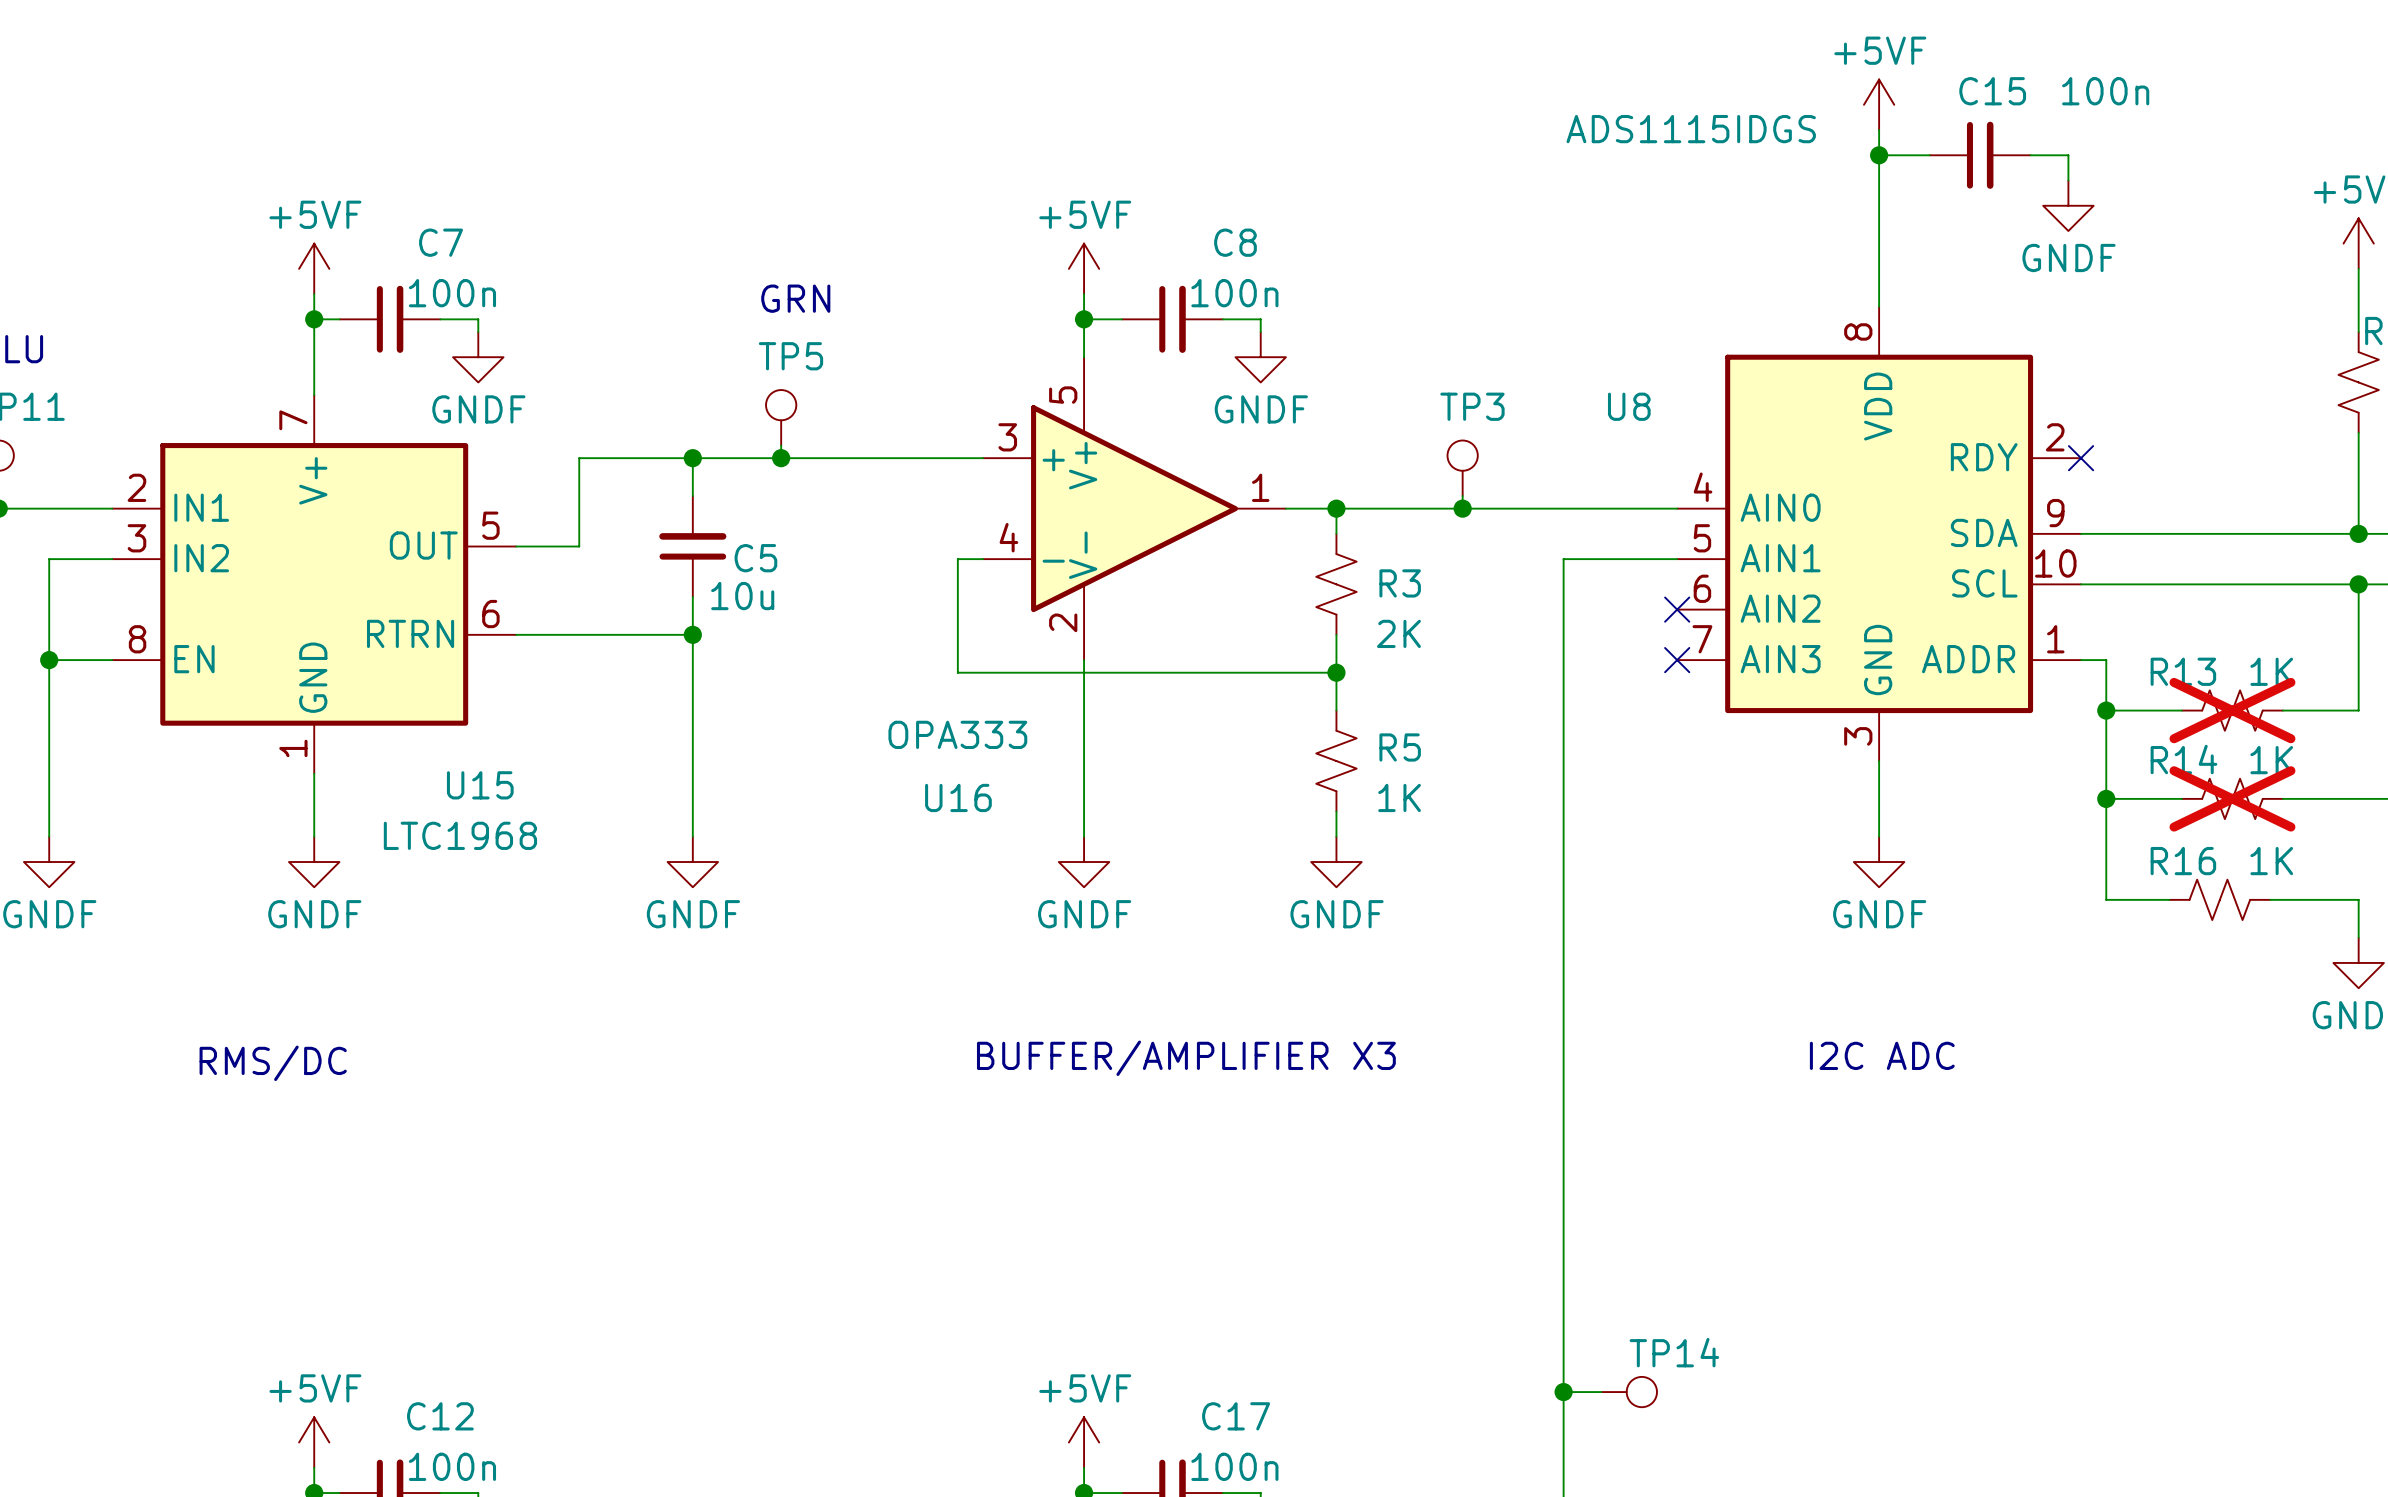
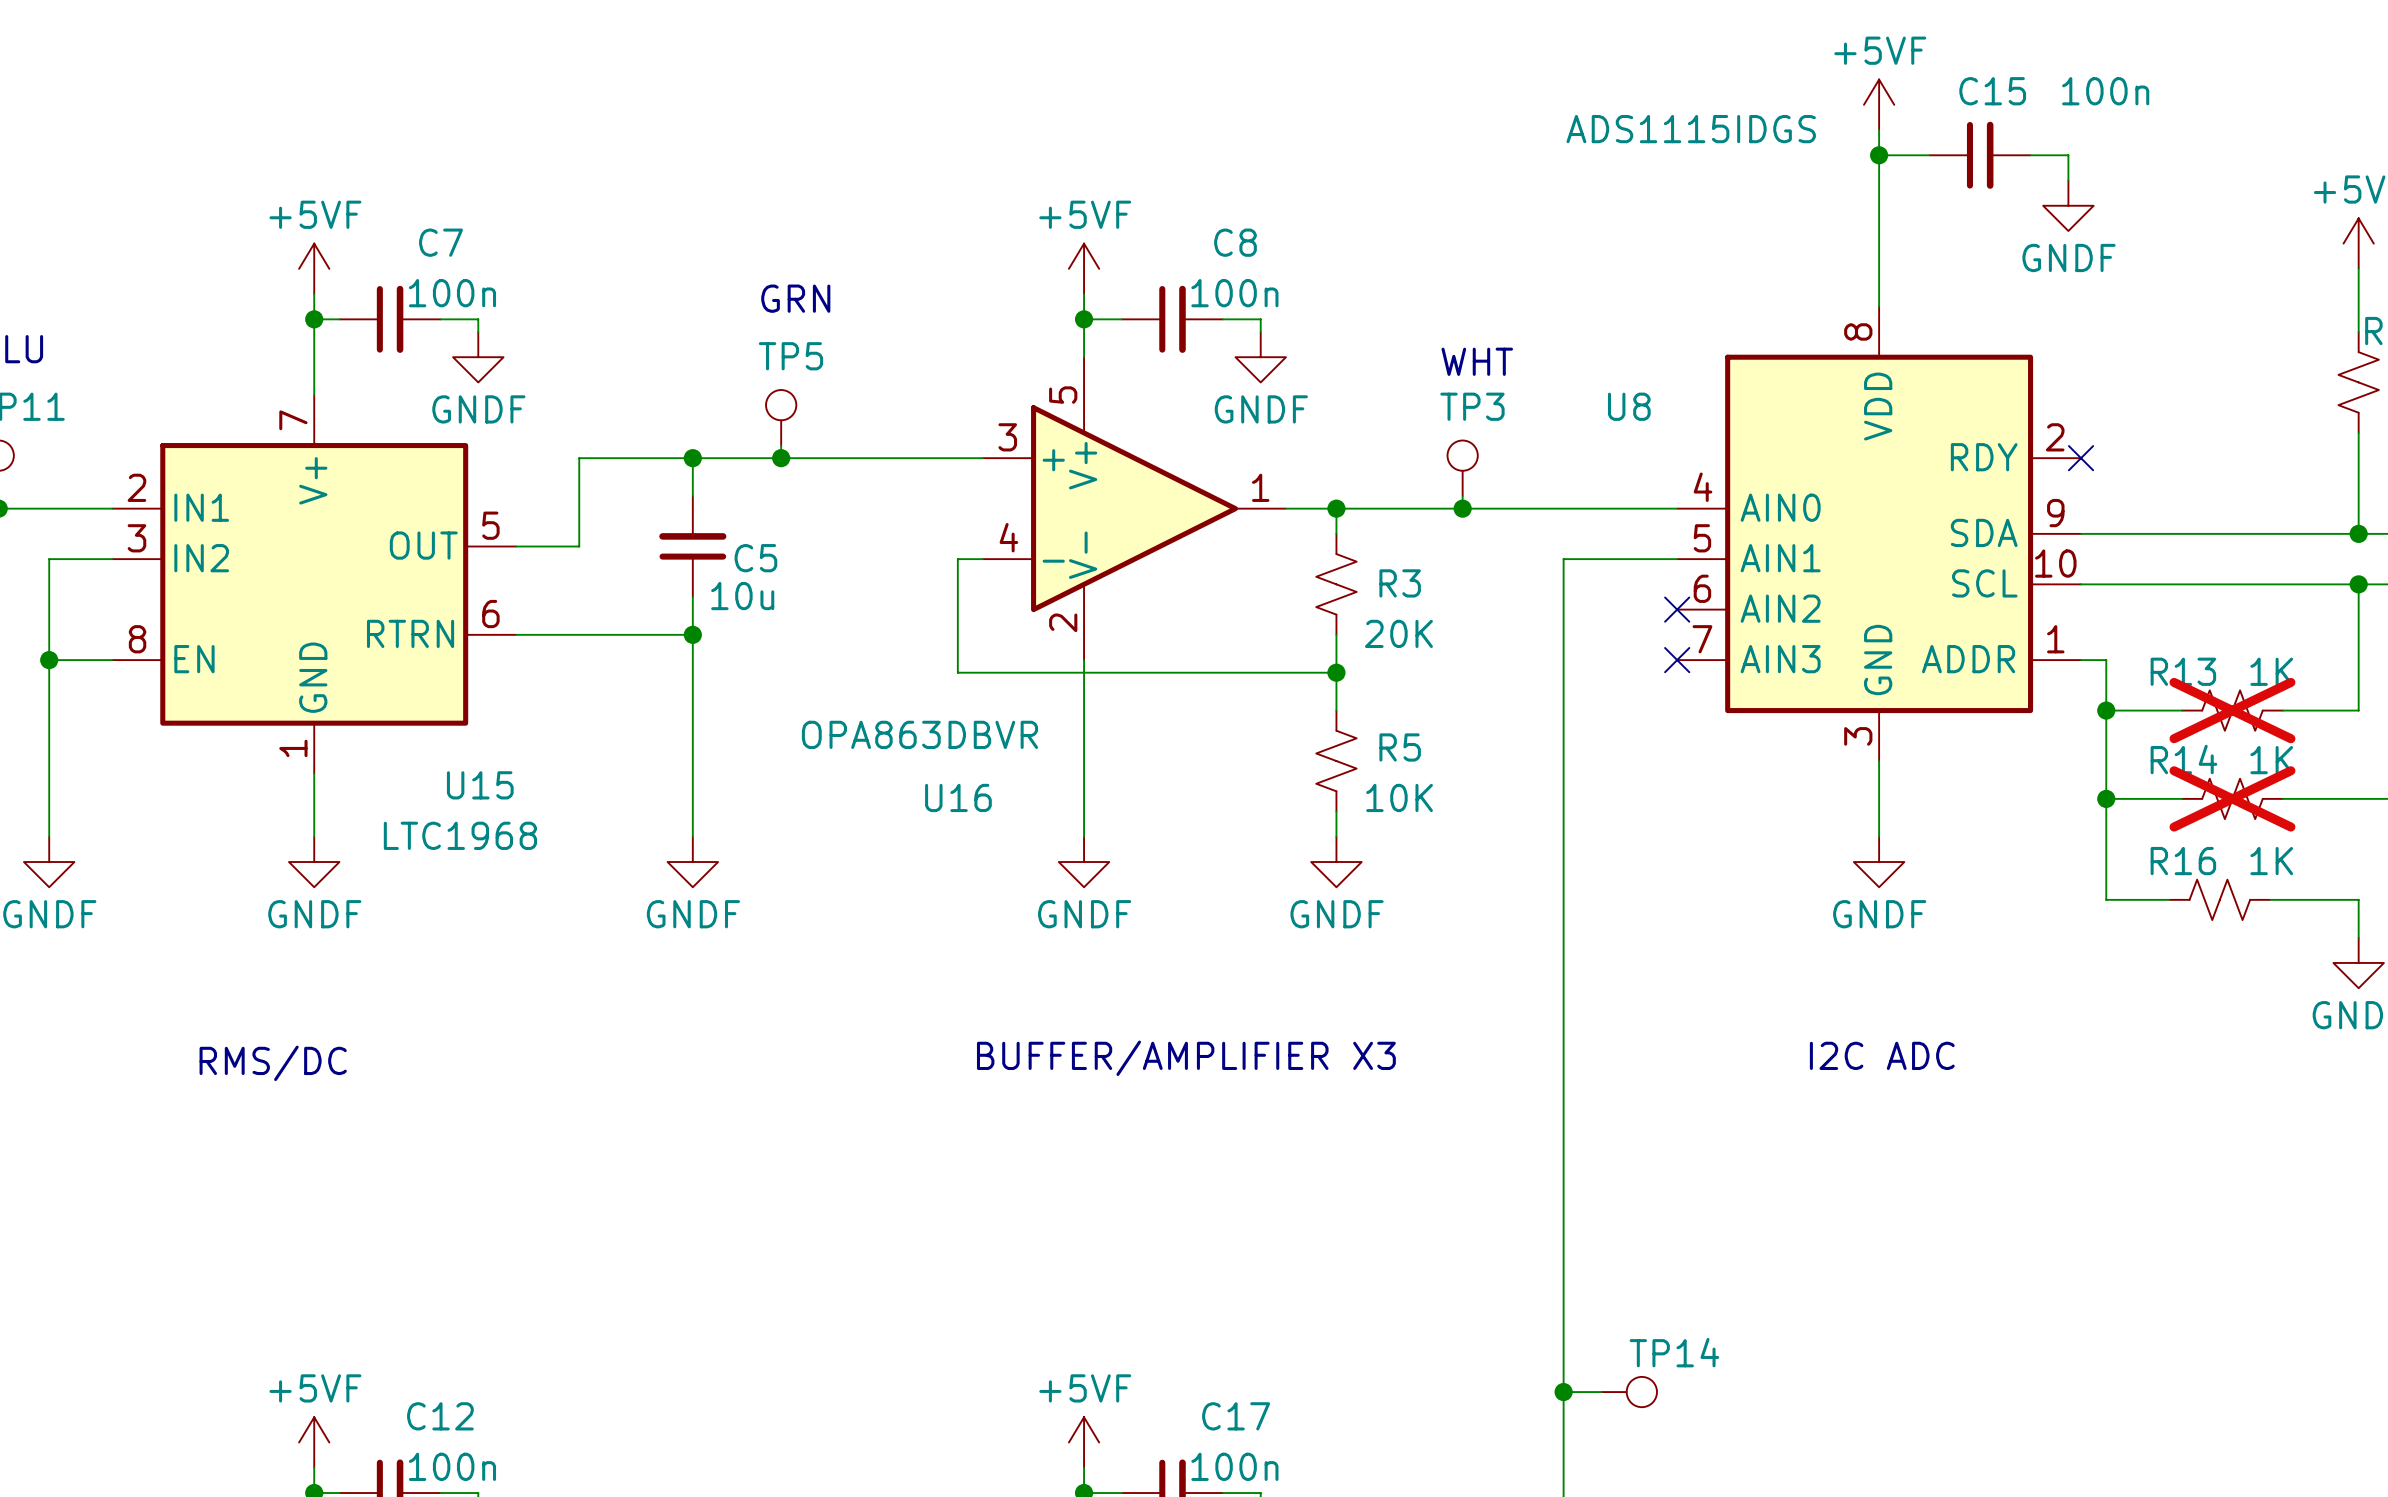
text: none -> WHT (1477, 361)
R3 value: 2K (1398, 633) -> 20K (1398, 633)
U16 value: OPA333 (957, 734) -> OPA863DBVR (919, 734)
R5 value: 1K (1399, 797) -> 10K (1399, 797)

